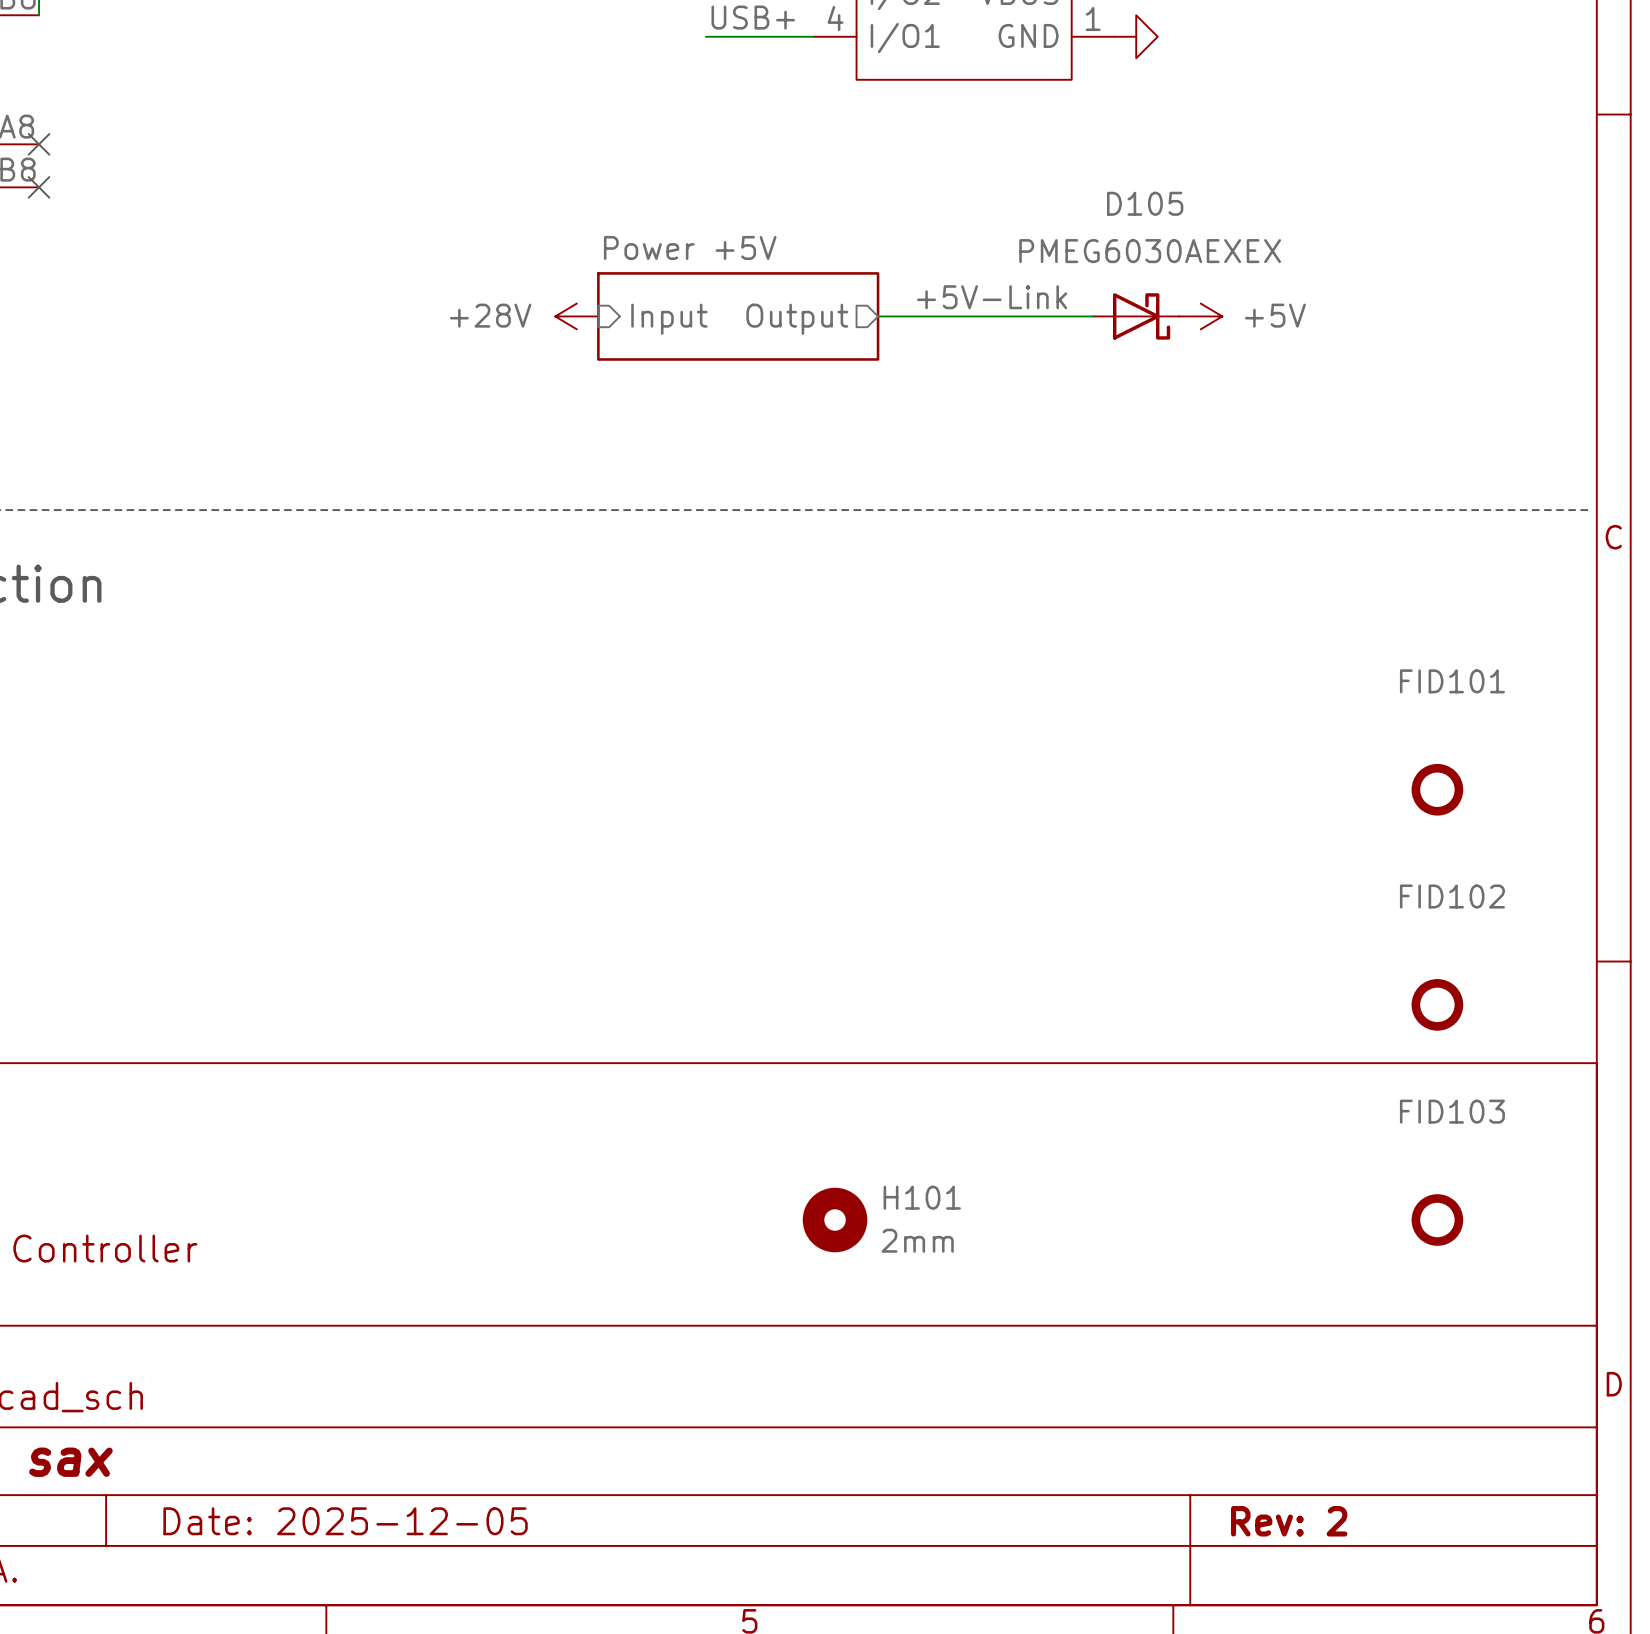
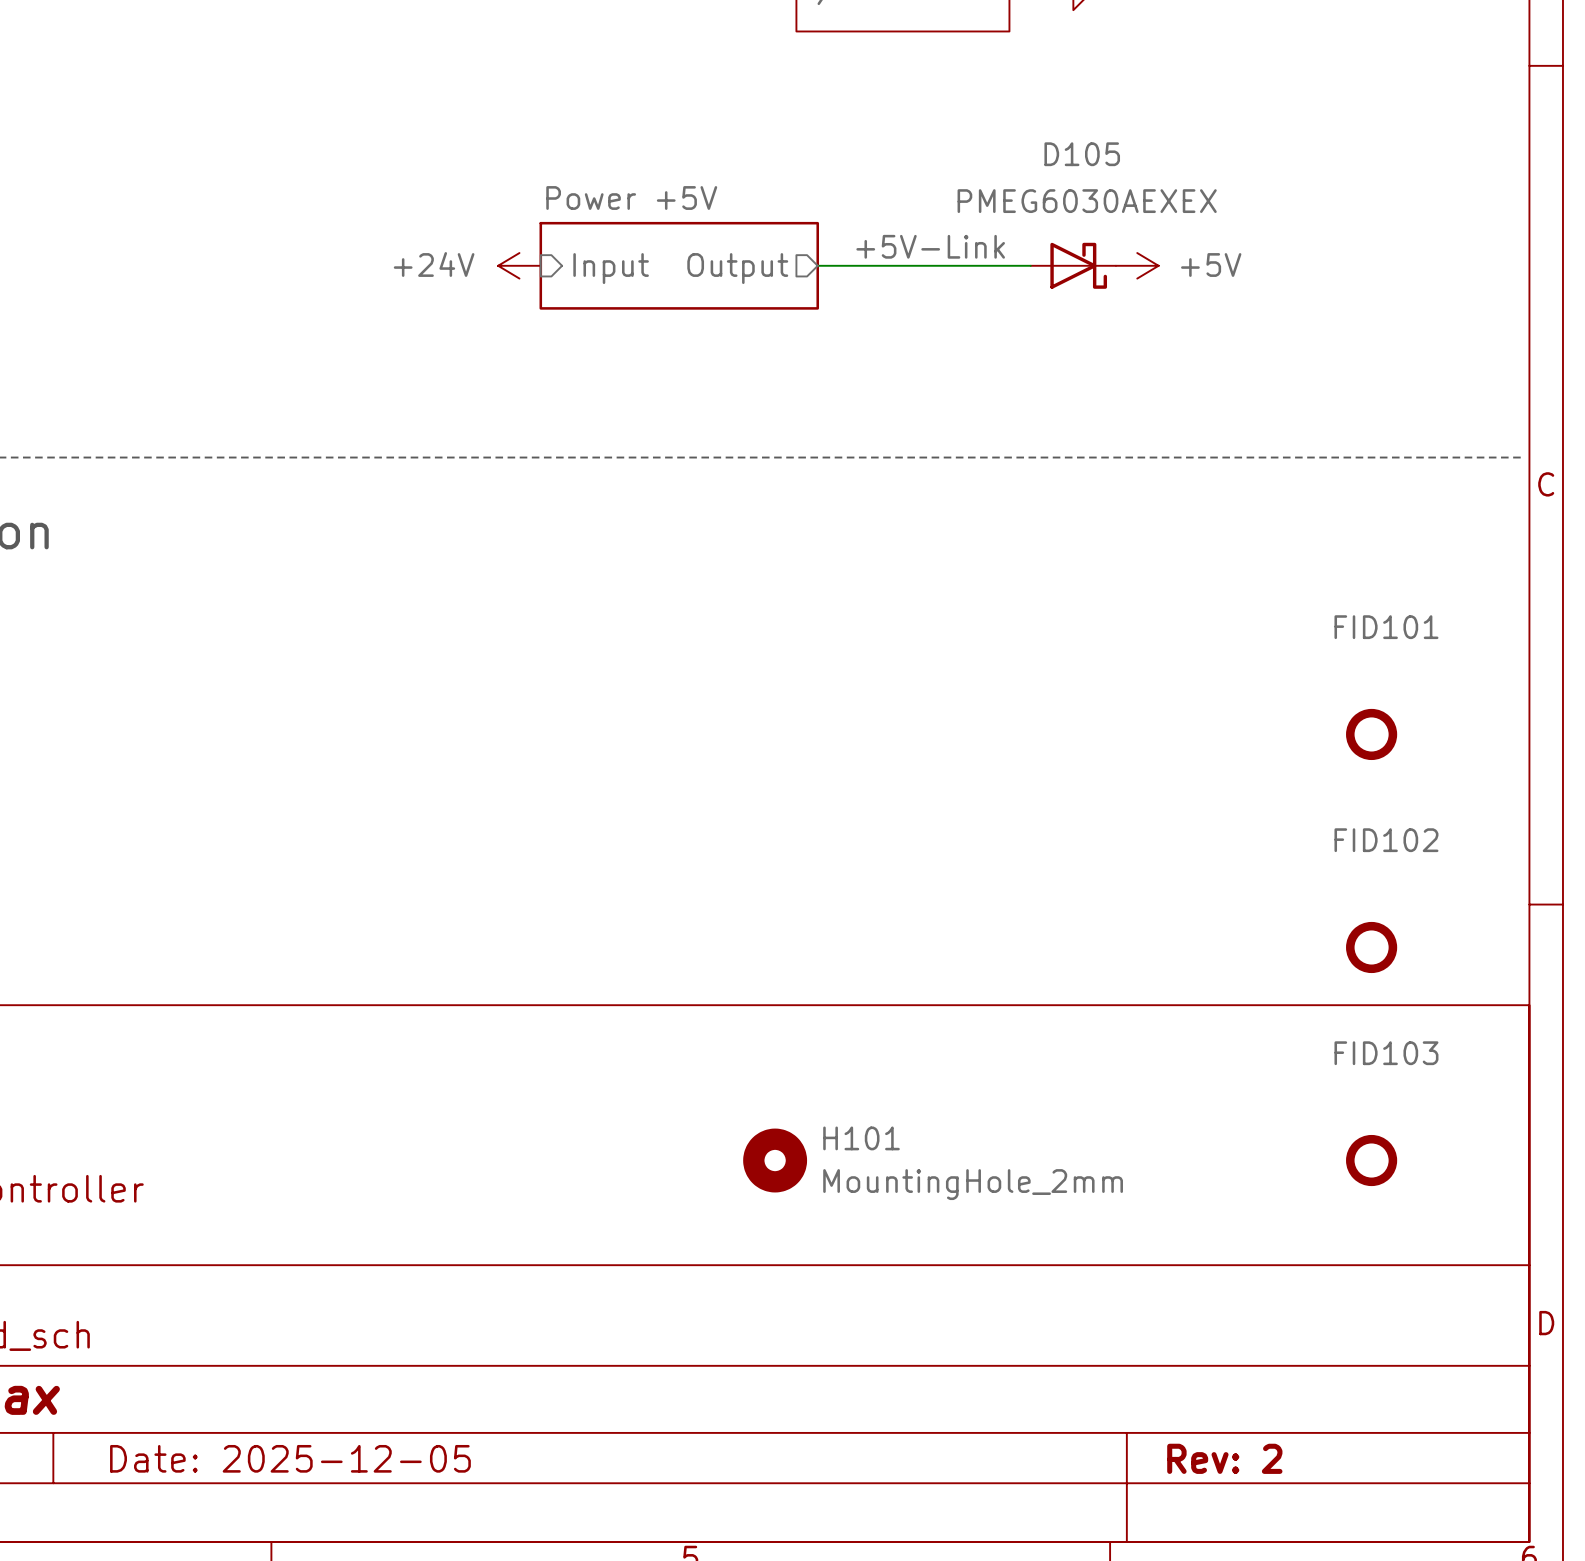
power symbol: +28V (576, 316) -> +24V (519, 265)
H101 value: 2mm (917, 1240) -> MountingHole_2mm (973, 1184)

